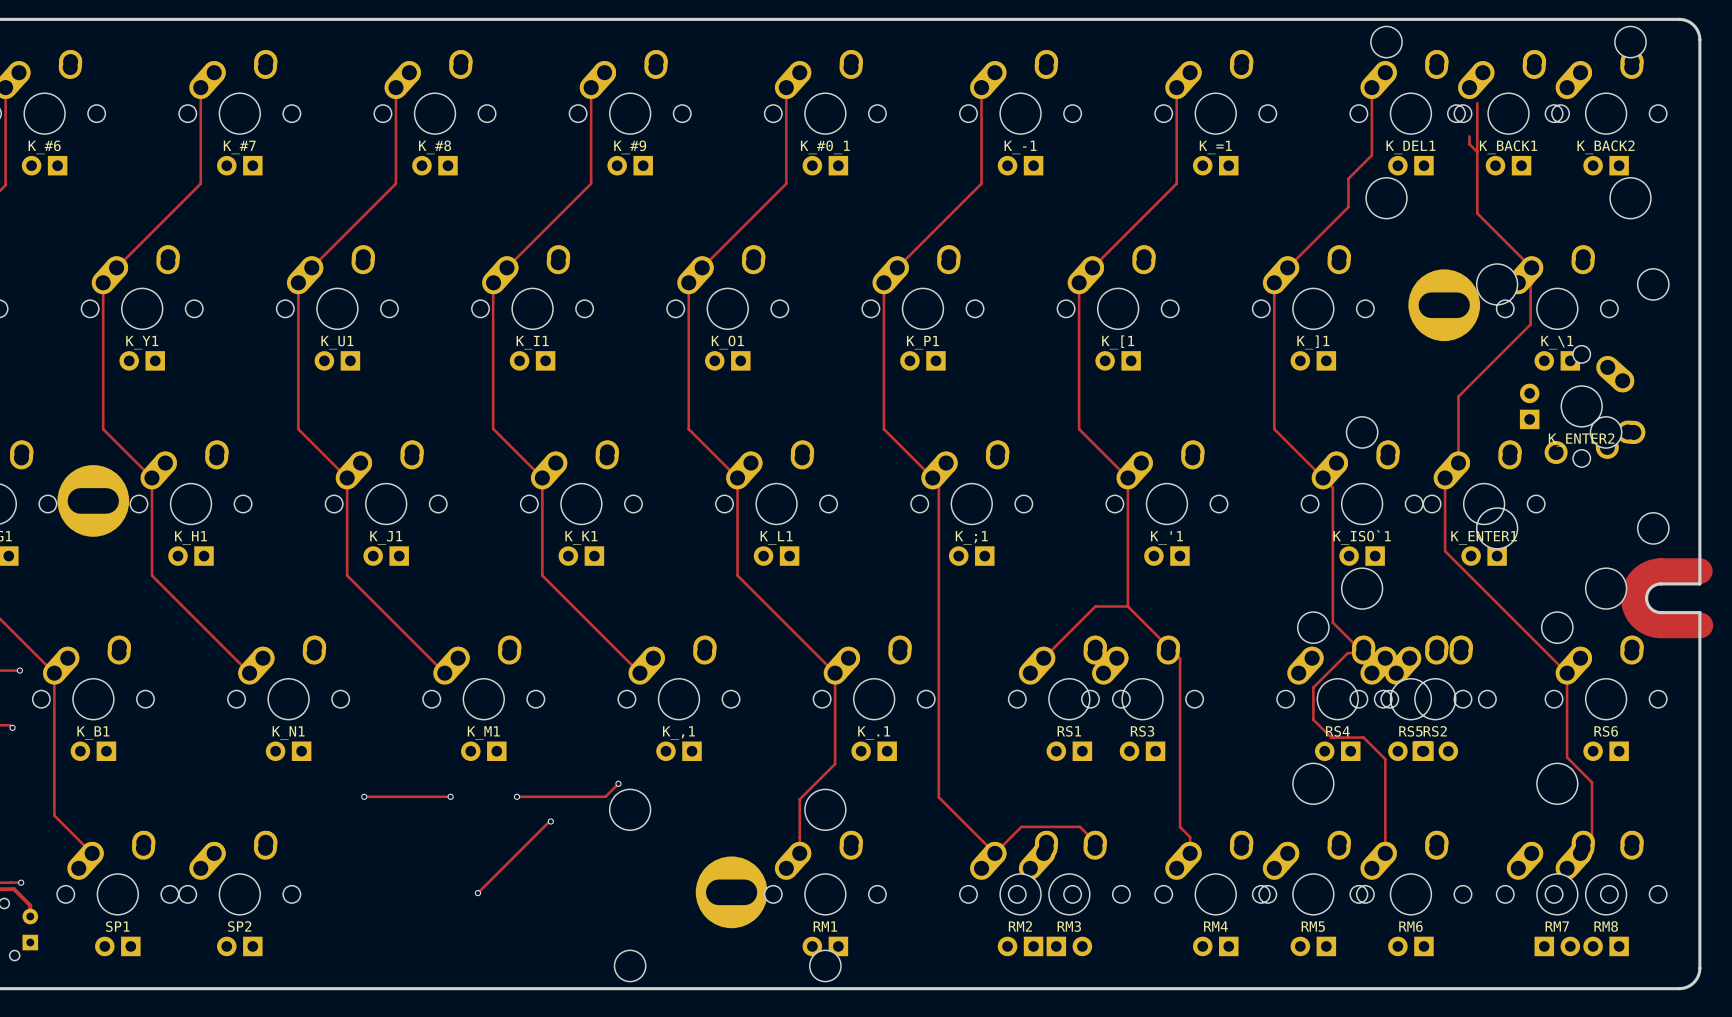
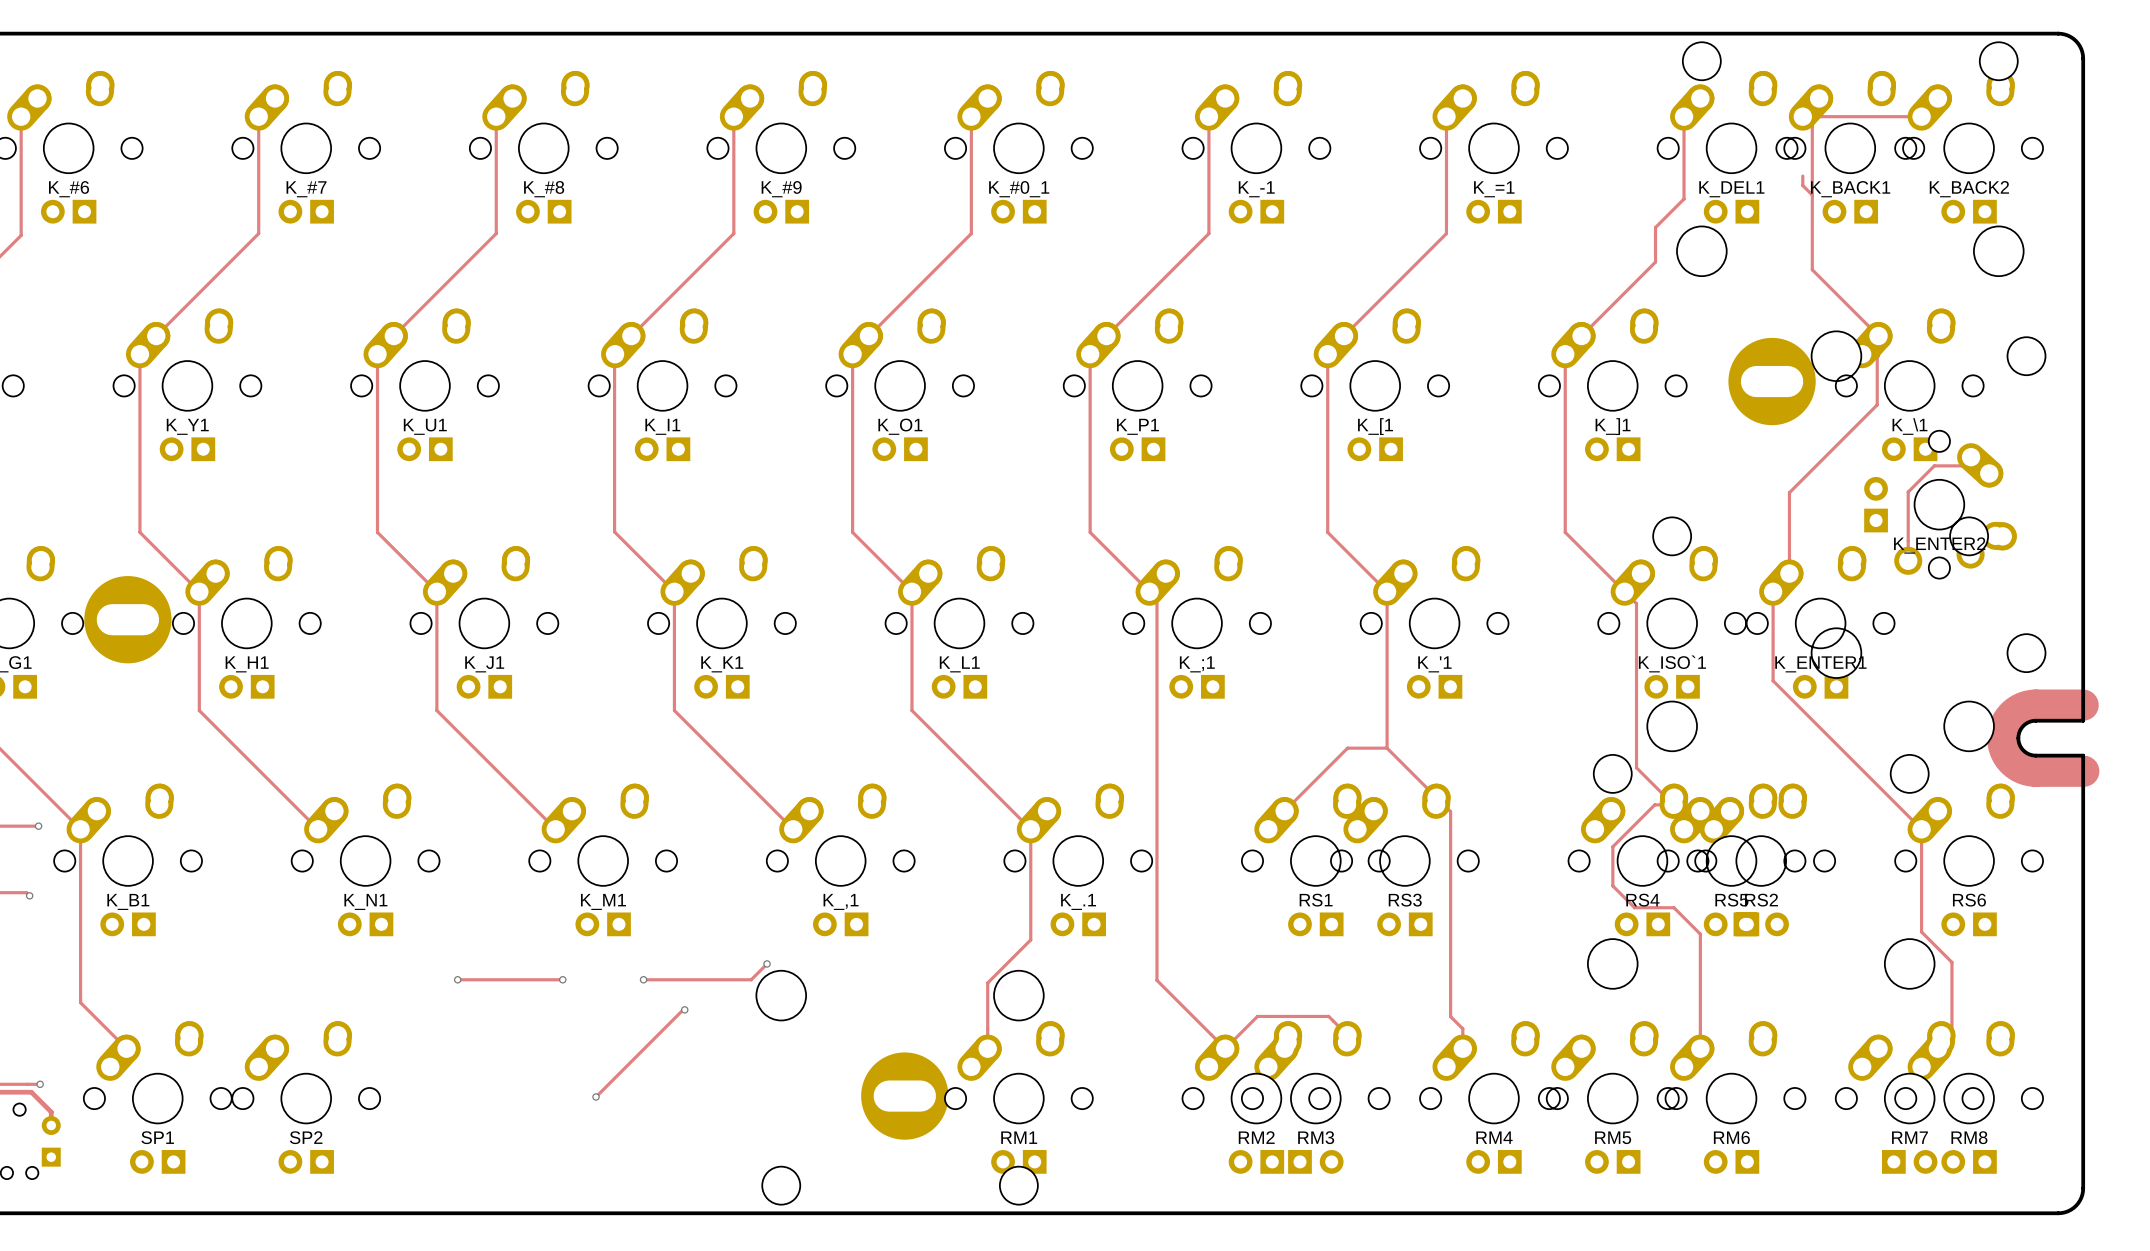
track: none -> (1921, 116) (1802, 116) (1812, 126) (1812, 135)
track: none -> (1971, 457) (1962, 465) (1934, 465) (1908, 492) (1908, 560)

